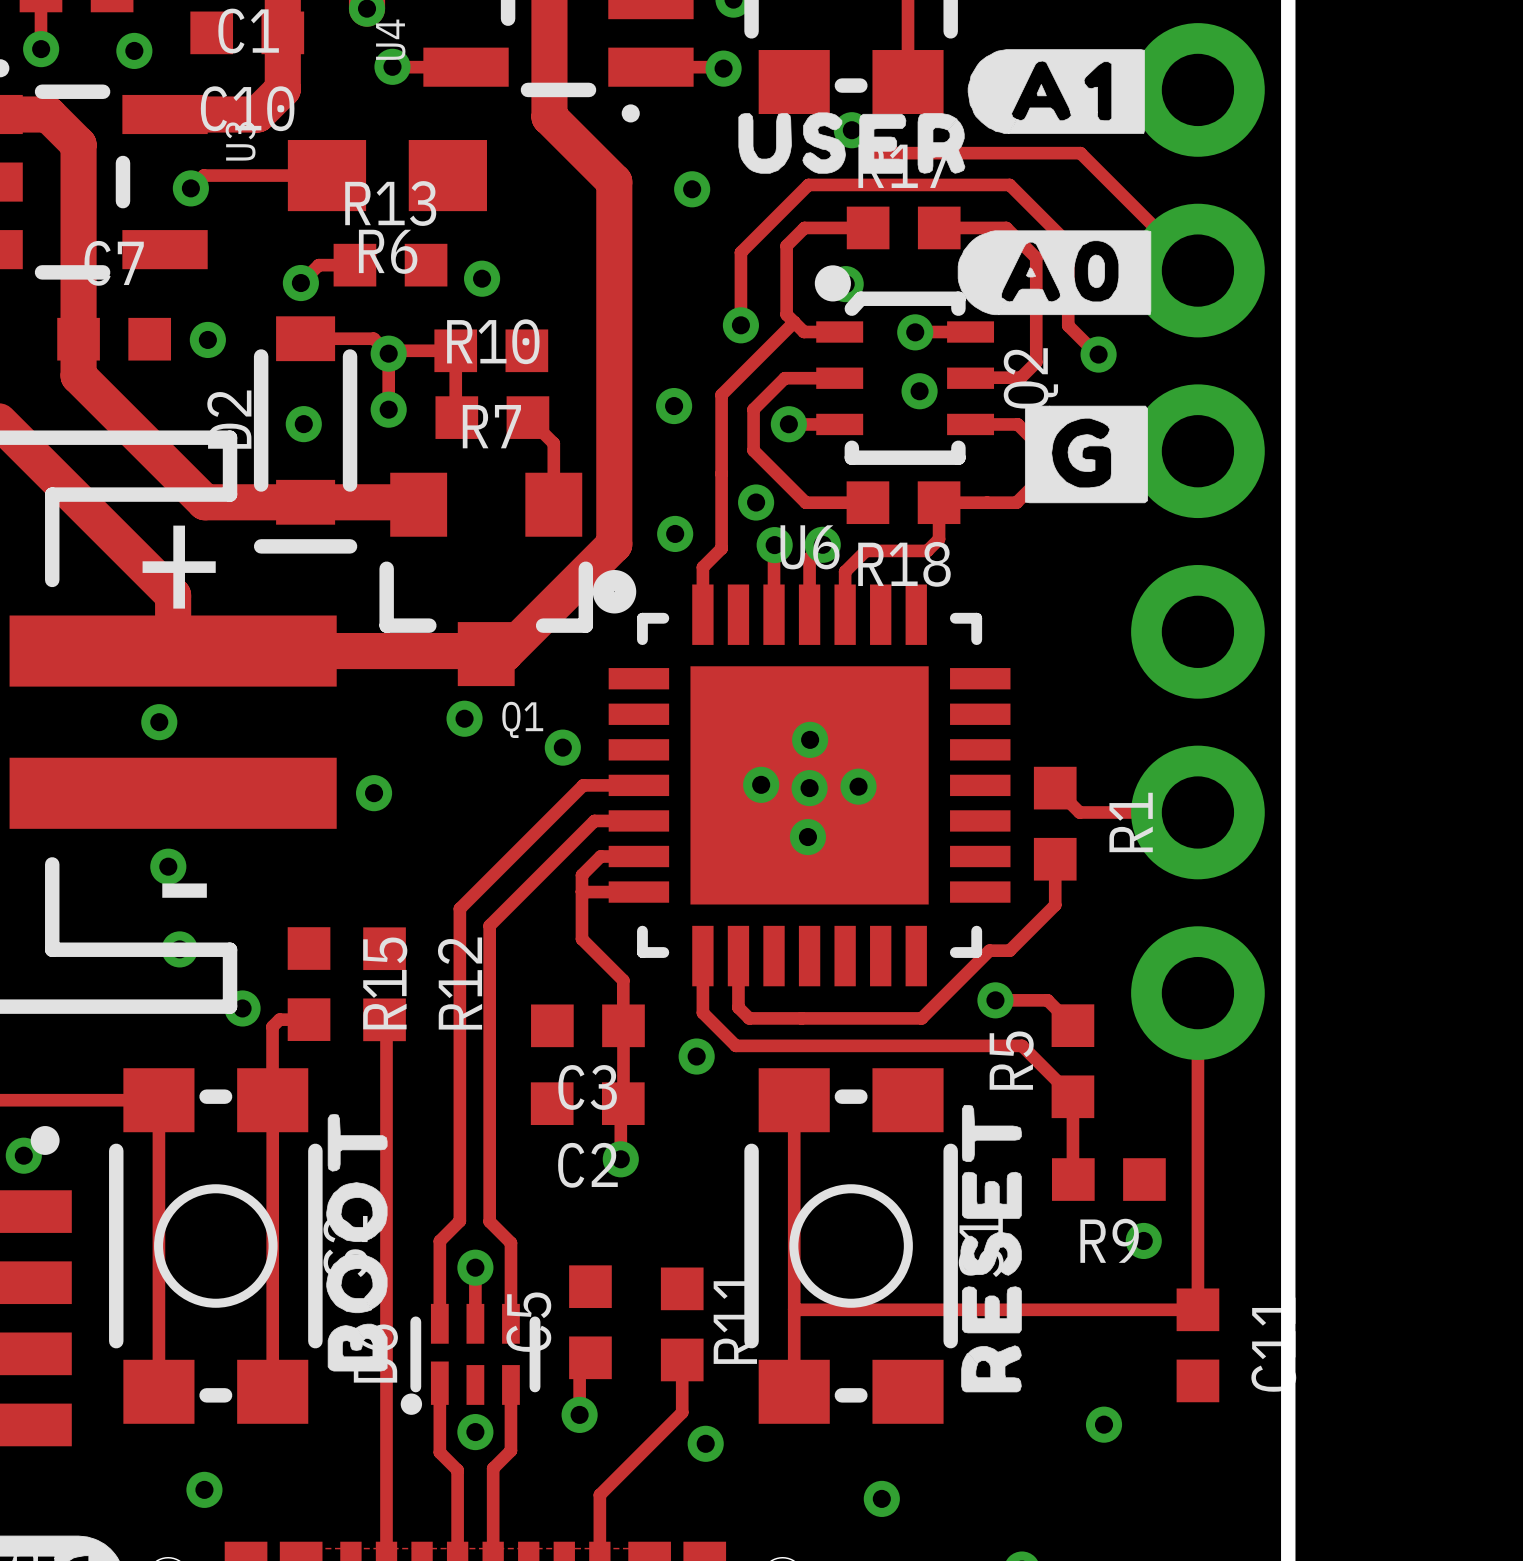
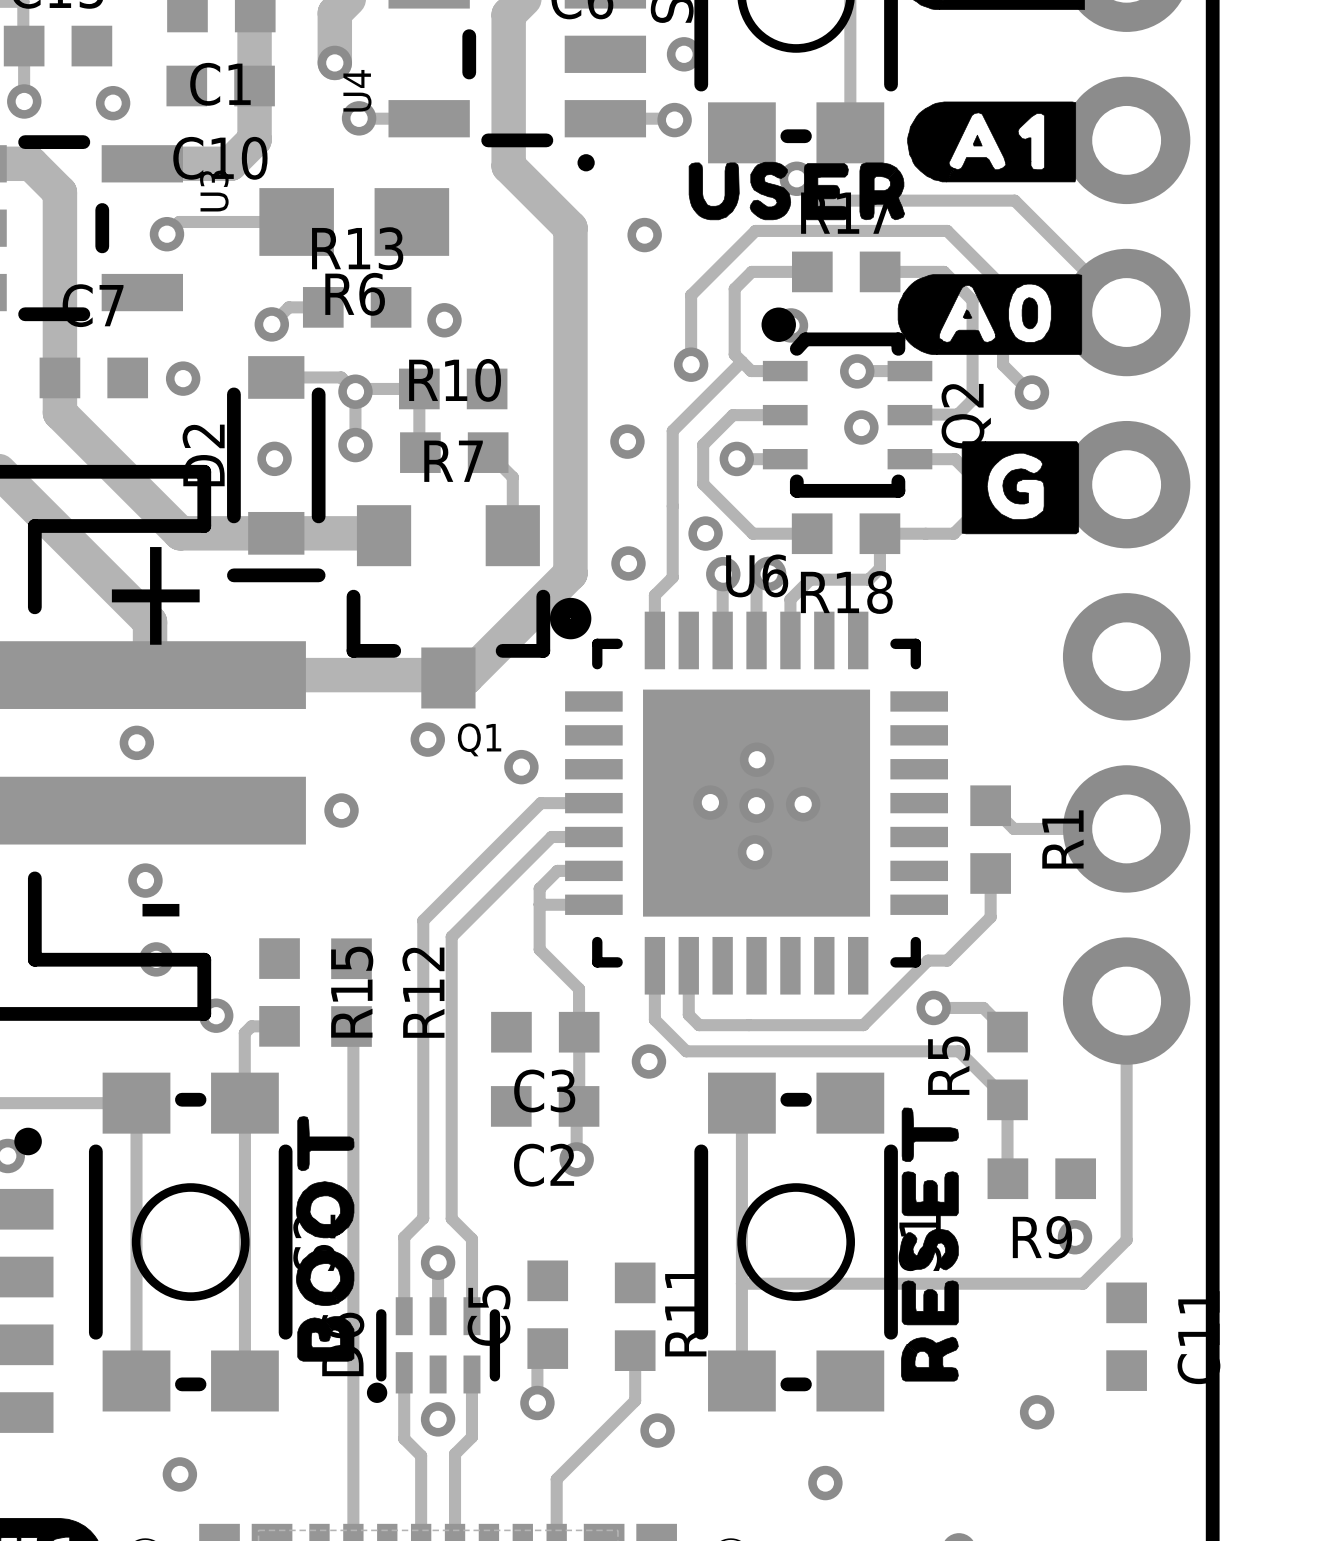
track: (1197, 1244) (1197, 1309) (794, 1309) -> (1126, 1240) (1083, 1283) (741, 1283)

